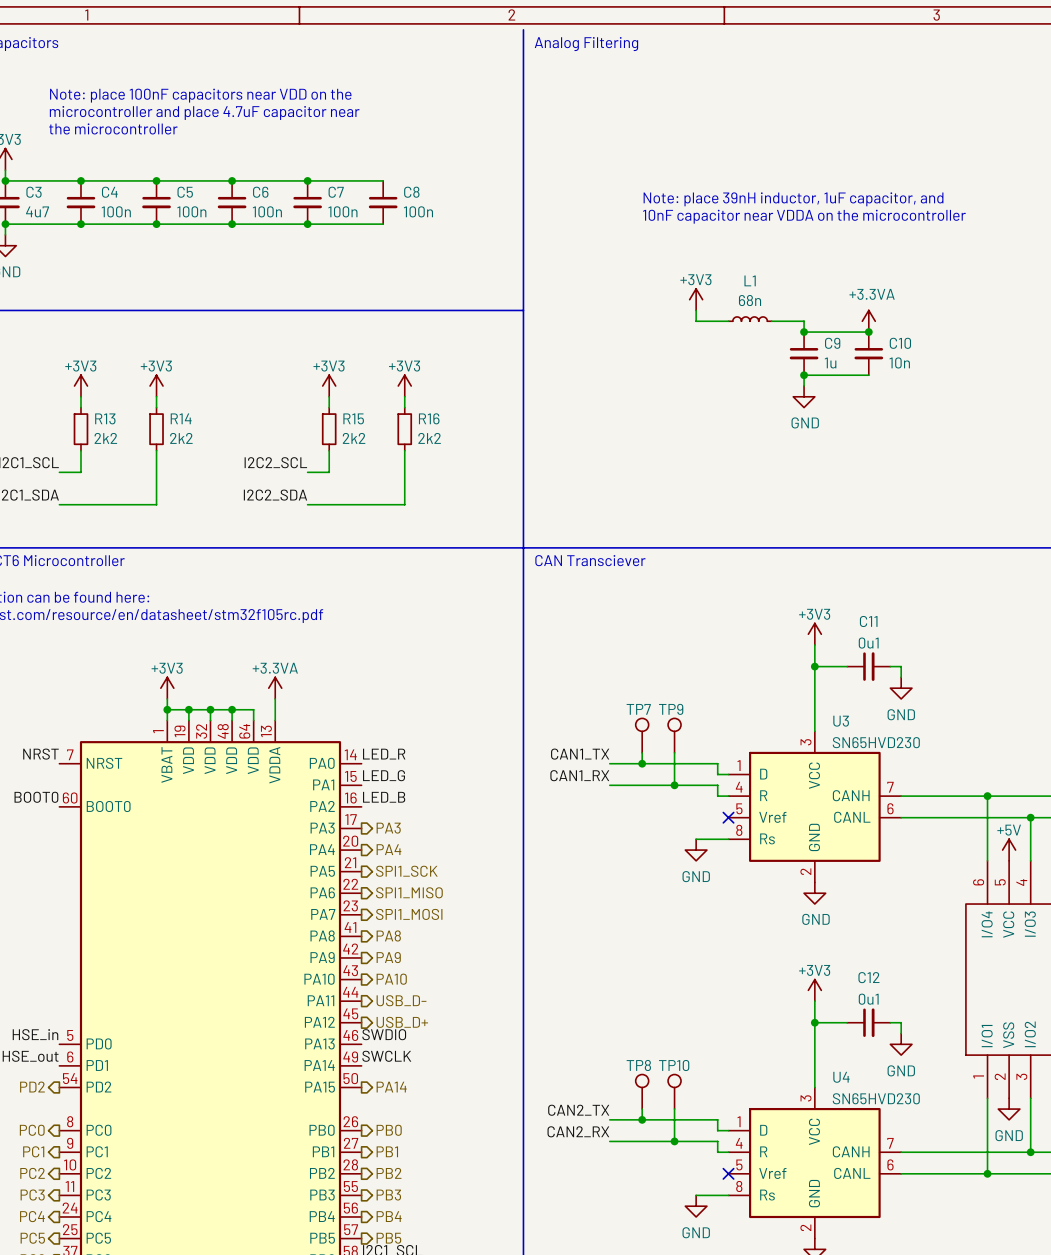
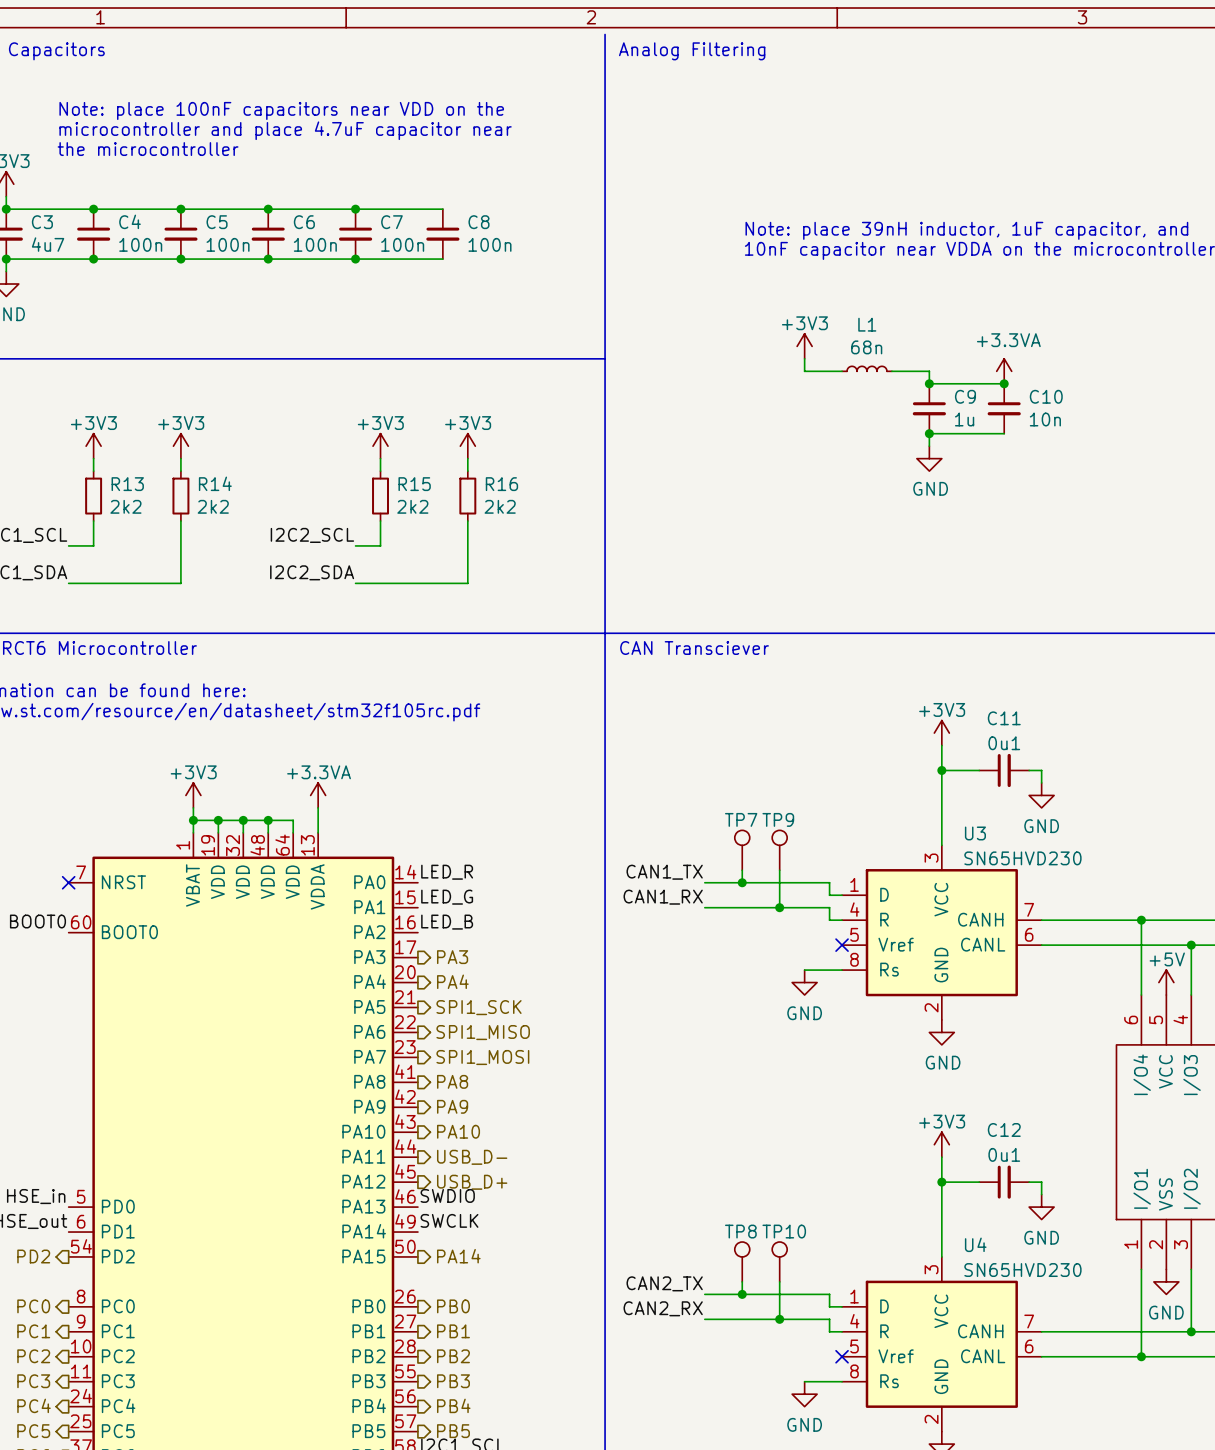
label: NRST (40, 754) -> none
no-connect mark: none -> (68, 882)

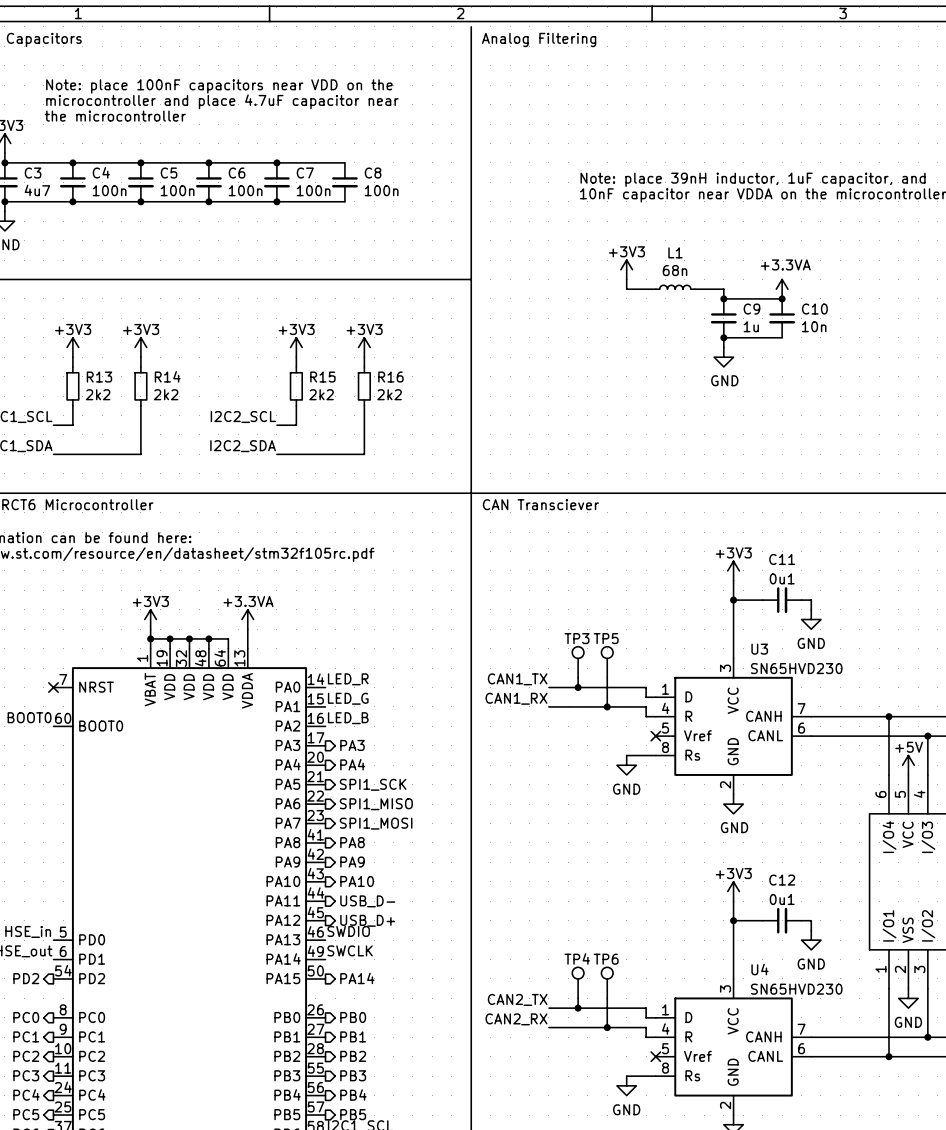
TP7 name: TP7 (741, 819) -> TP3 (577, 638)
TP9 name: TP9 (778, 819) -> TP5 (606, 638)
TP8 name: TP8 (740, 1231) -> TP4 (577, 958)
TP10 name: TP10 (784, 1231) -> TP6 (606, 959)

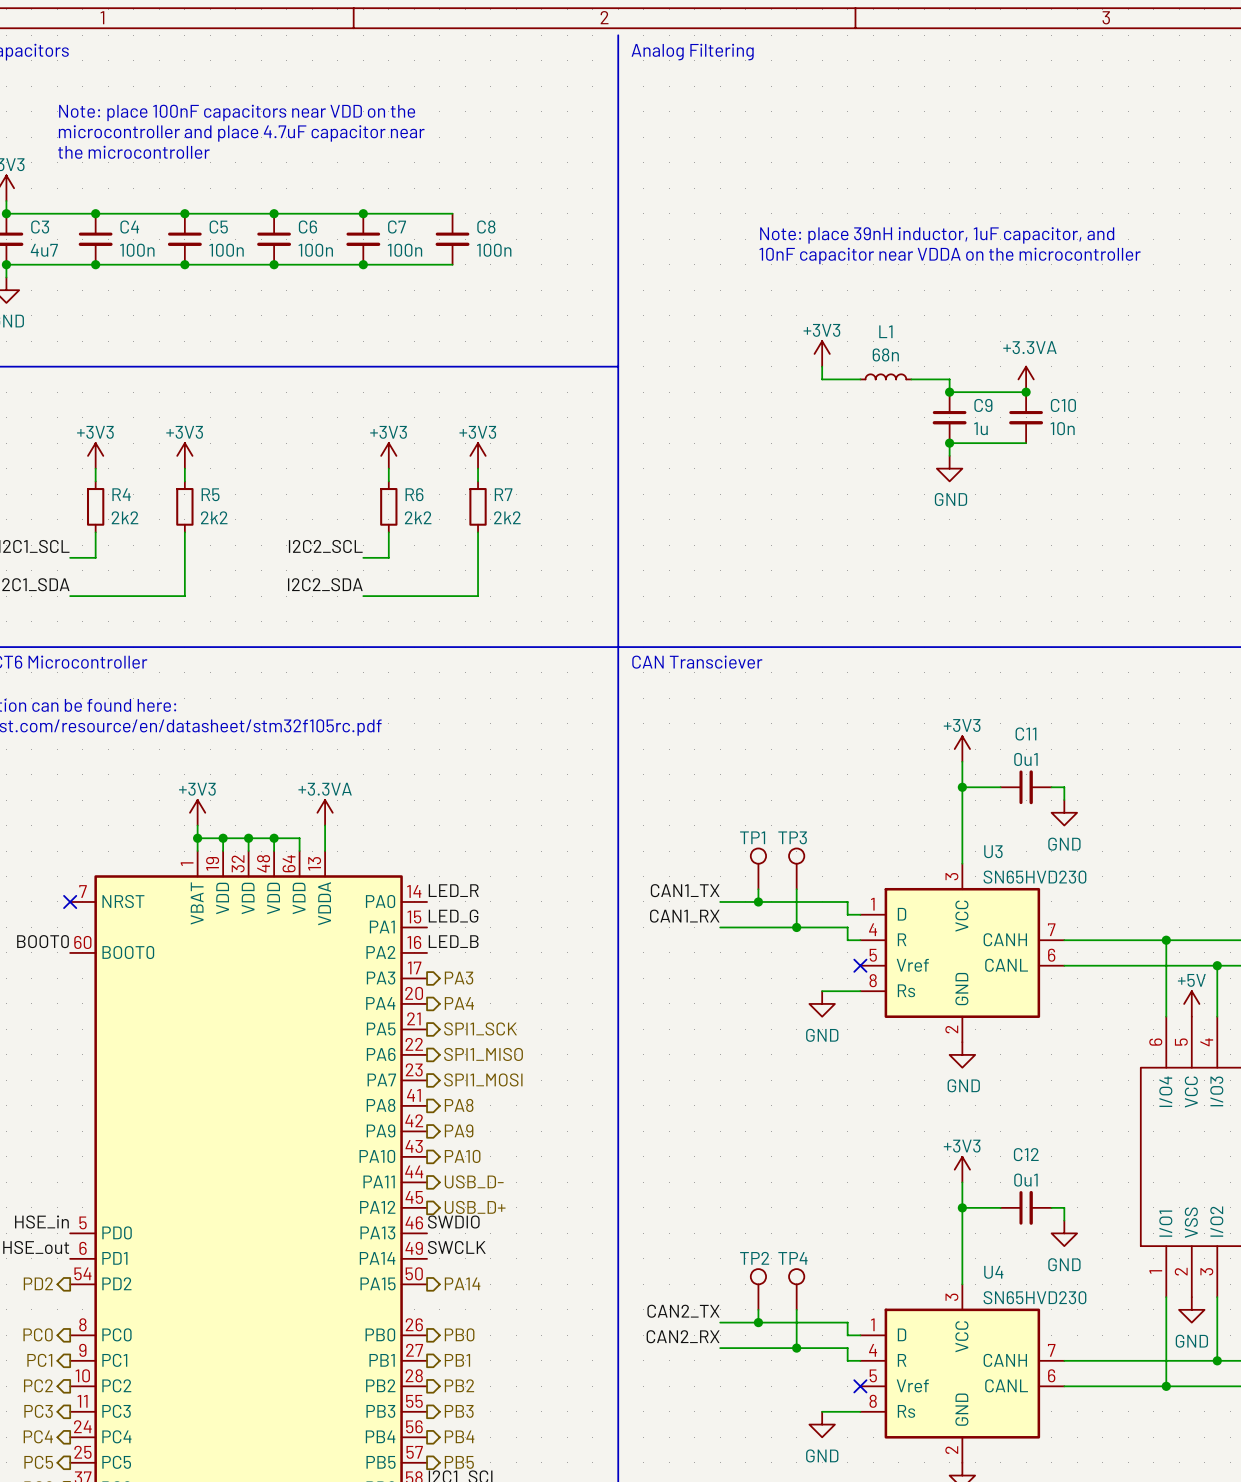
R14 name: R14 (167, 376) -> R5 (210, 494)
R13 name: R13 (99, 377) -> R4 (121, 494)
R15 name: R15 (322, 377) -> R6 (414, 494)
R16 name: R16 (390, 377) -> R7 (503, 494)
TP3 name: TP3 (577, 638) -> TP1 (752, 837)
TP5 name: TP5 (606, 638) -> TP3 (792, 837)
TP4 name: TP4 (577, 958) -> TP2 (754, 1258)
TP6 name: TP6 (606, 959) -> TP4 (792, 1258)

